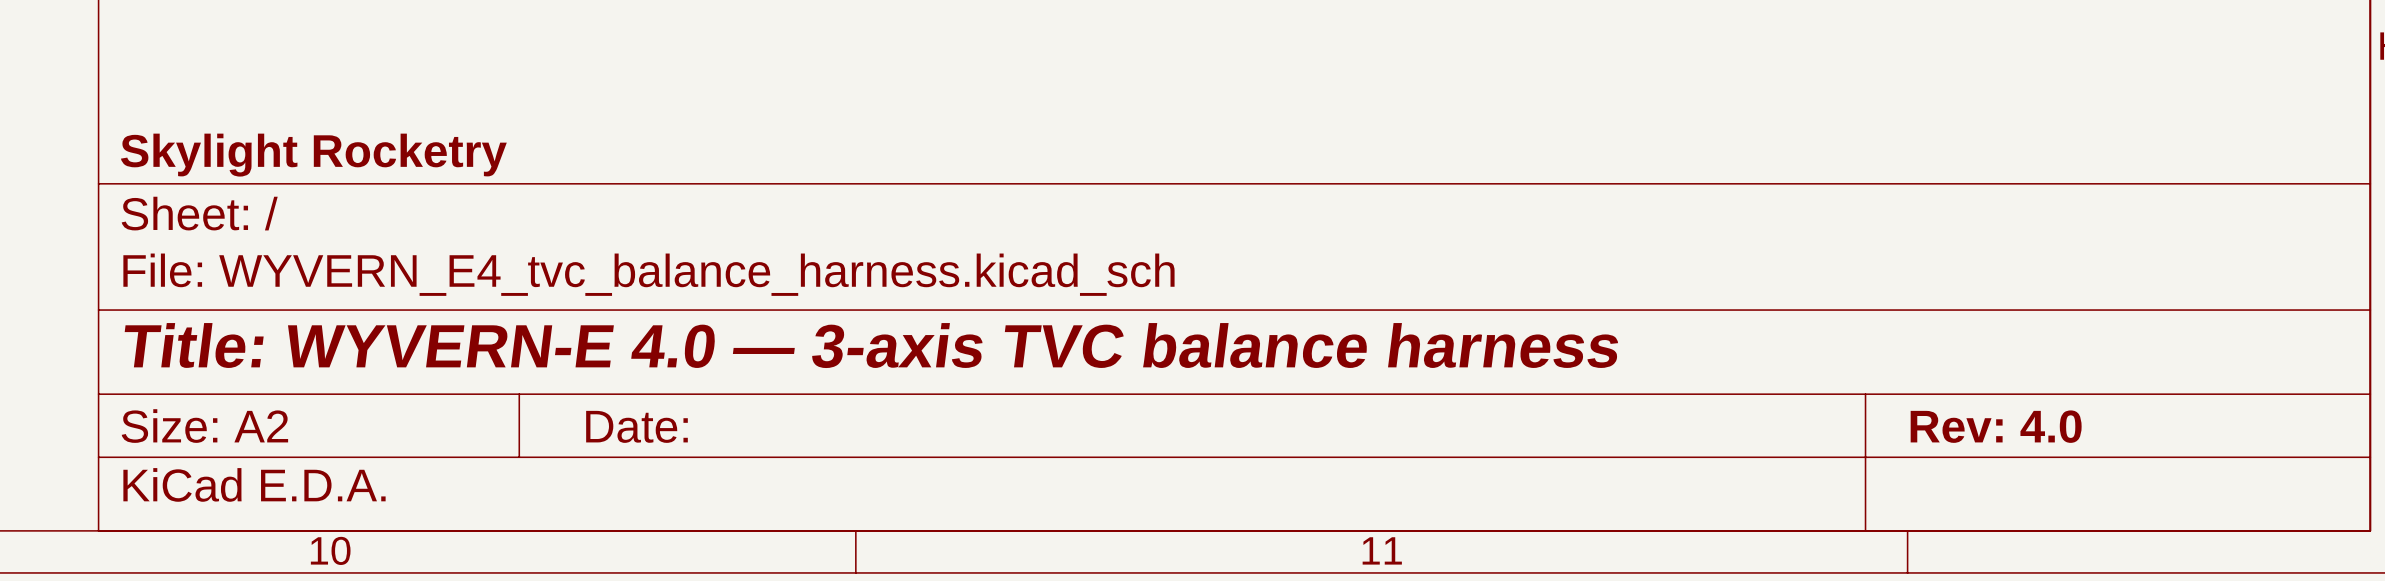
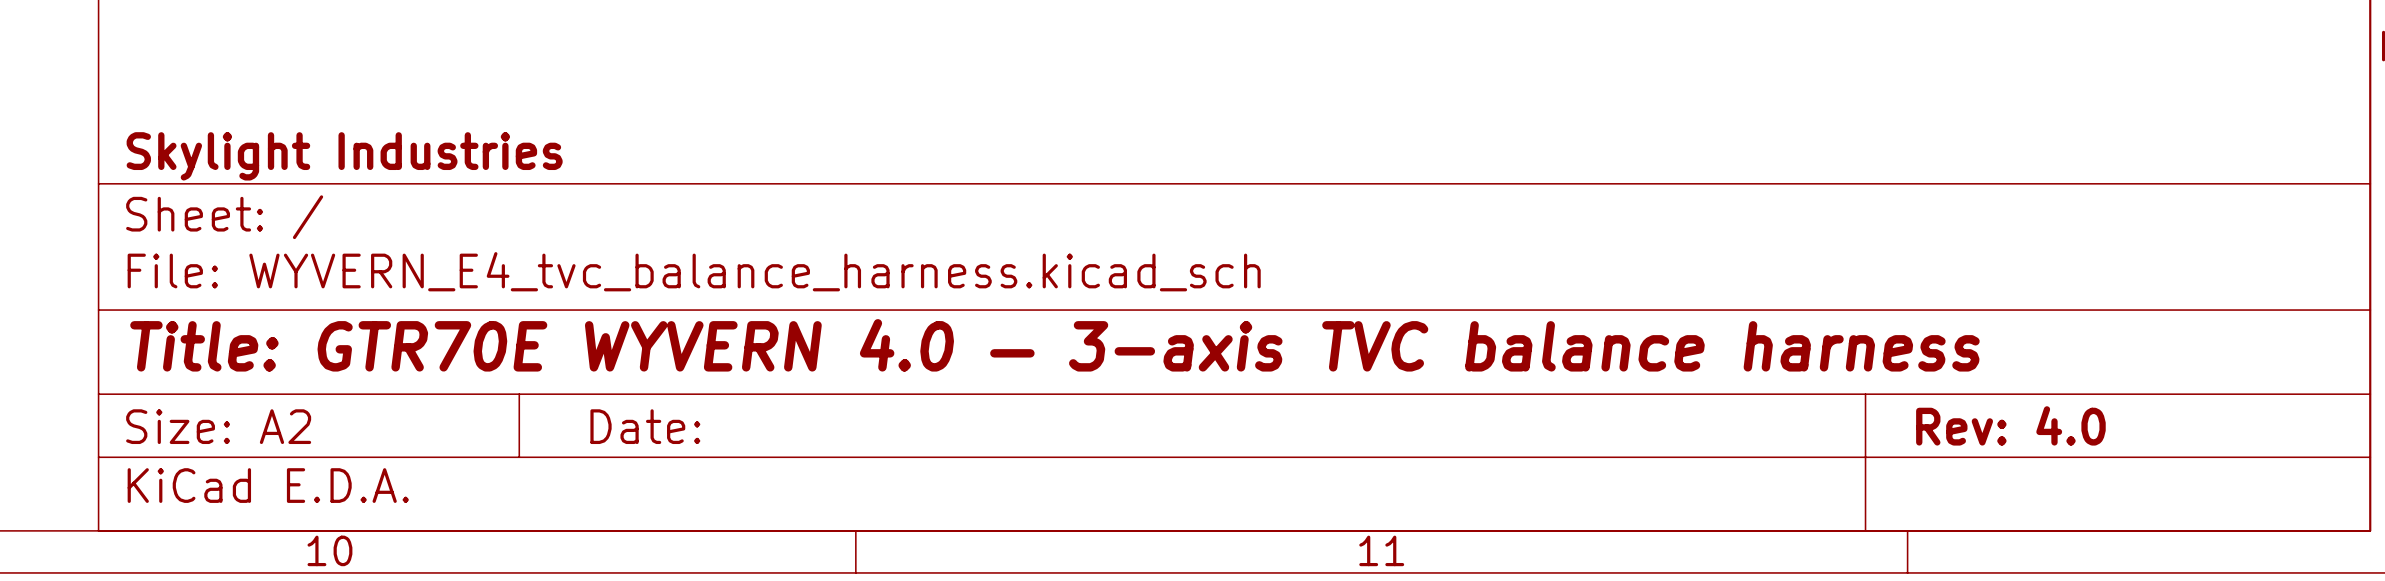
title block: Skylight Rocketry (313, 155) -> Skylight Industries (344, 156)
title block: Title: WYVERN-E 4.0 — 3-axis TVC balance harness (871, 345) -> Title: GTR70E WYVERN 4.0 — 3-axis TVC balance harness (1054, 345)

